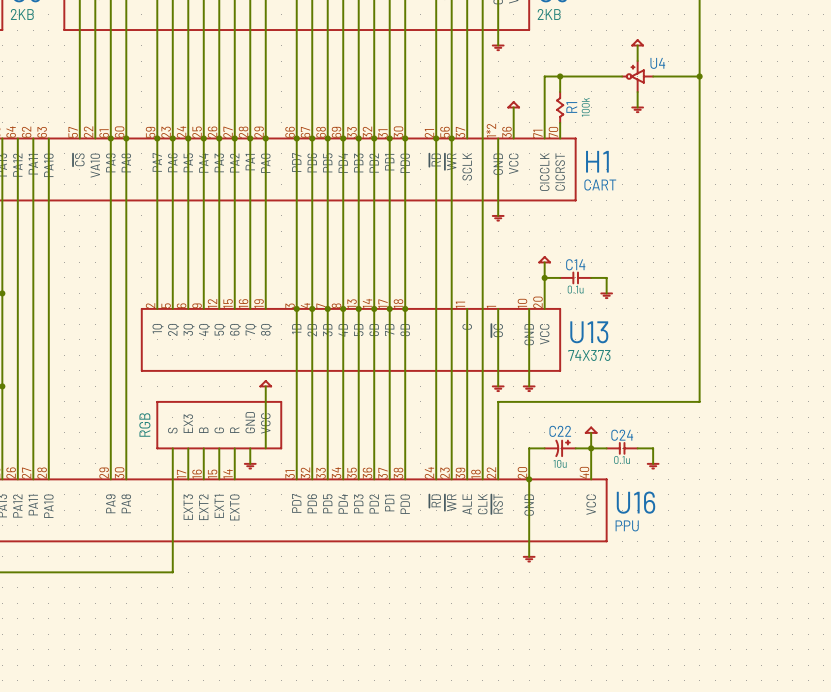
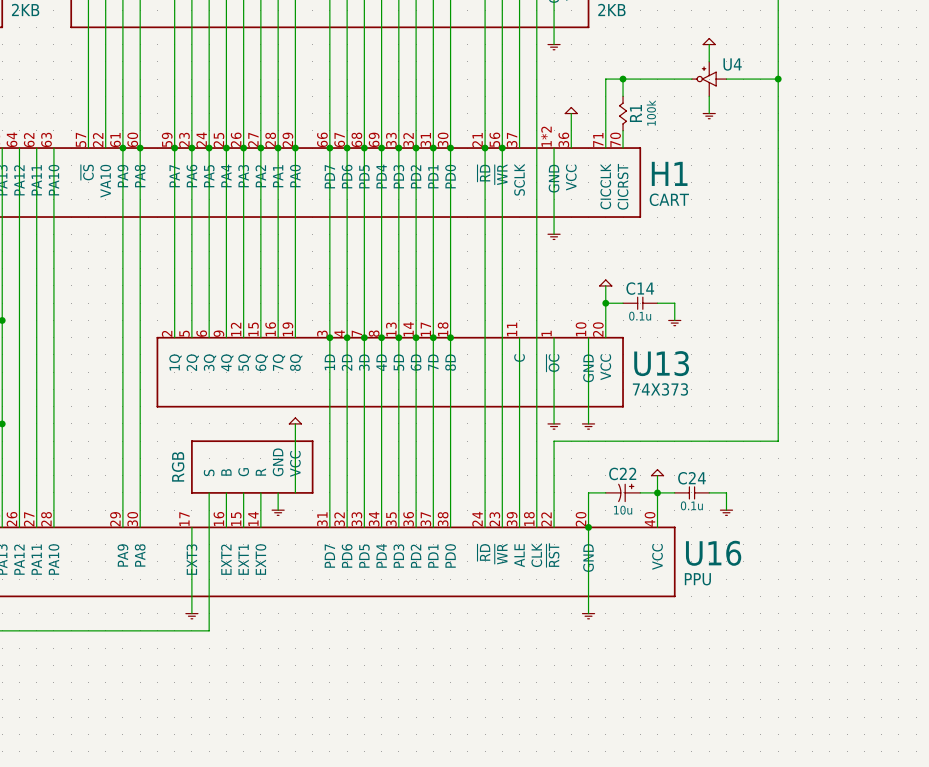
RGB: (219, 425) -> none
RGB: none -> (252, 467)
wire: (172, 448) (172, 479) -> none
U16 pin number: none -> 17 (184, 519)
U16 pin number: 17 (181, 474) -> none
U16 pin name: none -> EXT3 (191, 559)
U16 pin name: EXT3 (188, 507) -> none
wire: (172, 556) (172, 572) -> (209, 527) (209, 630) (191, 630)
power symbol: none -> (191, 616)

